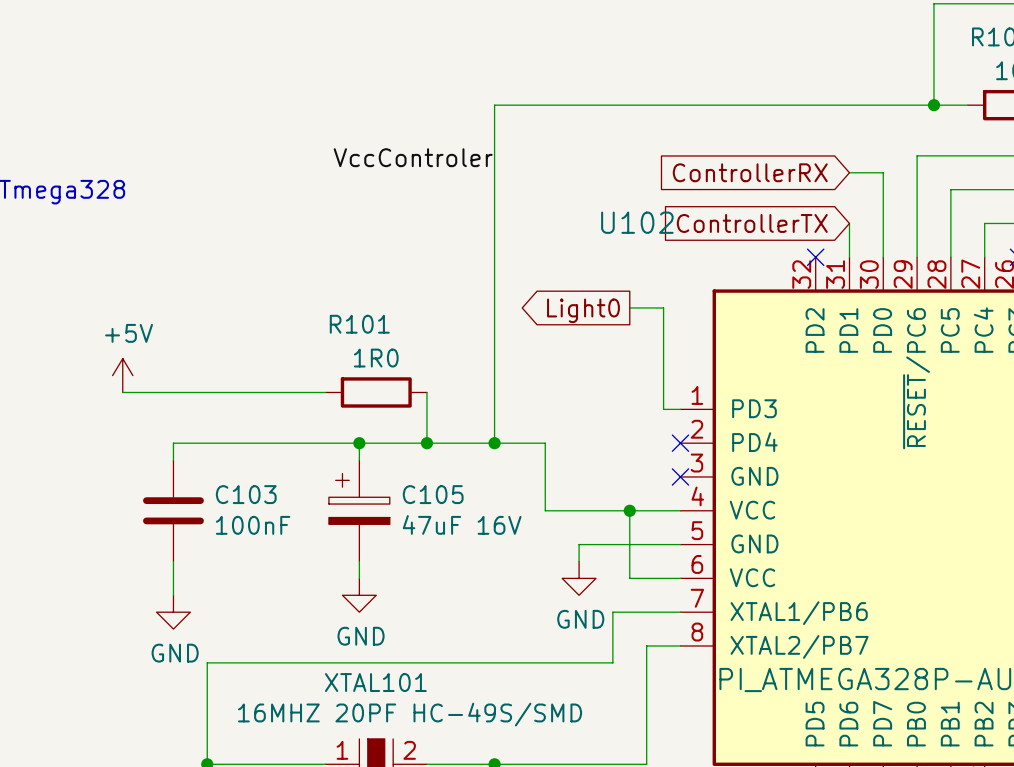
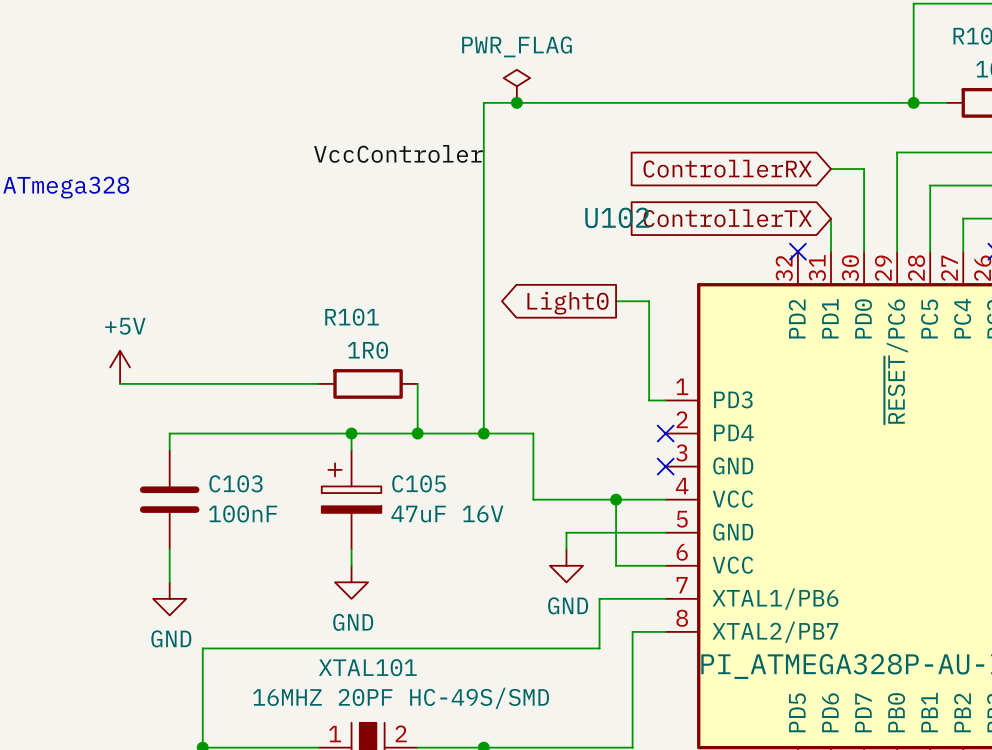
power symbol: none -> PWR_FLAG (516, 86)
junction: none -> (516, 102)

